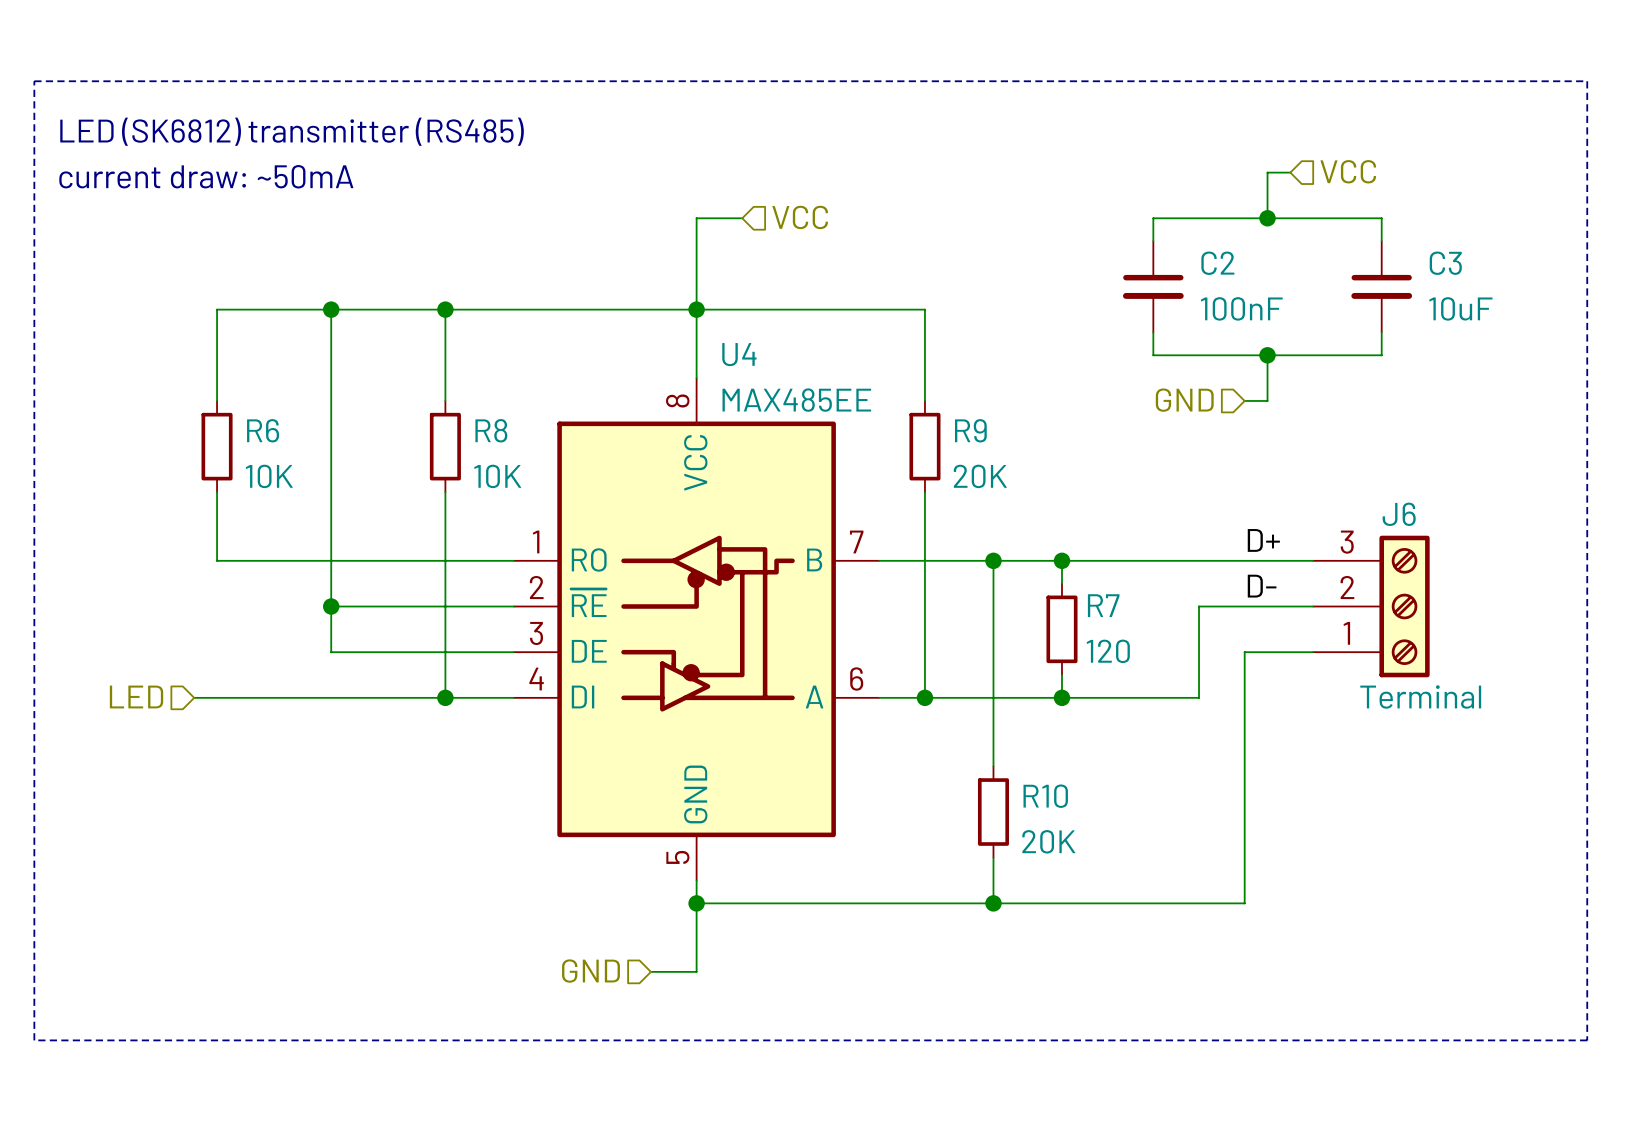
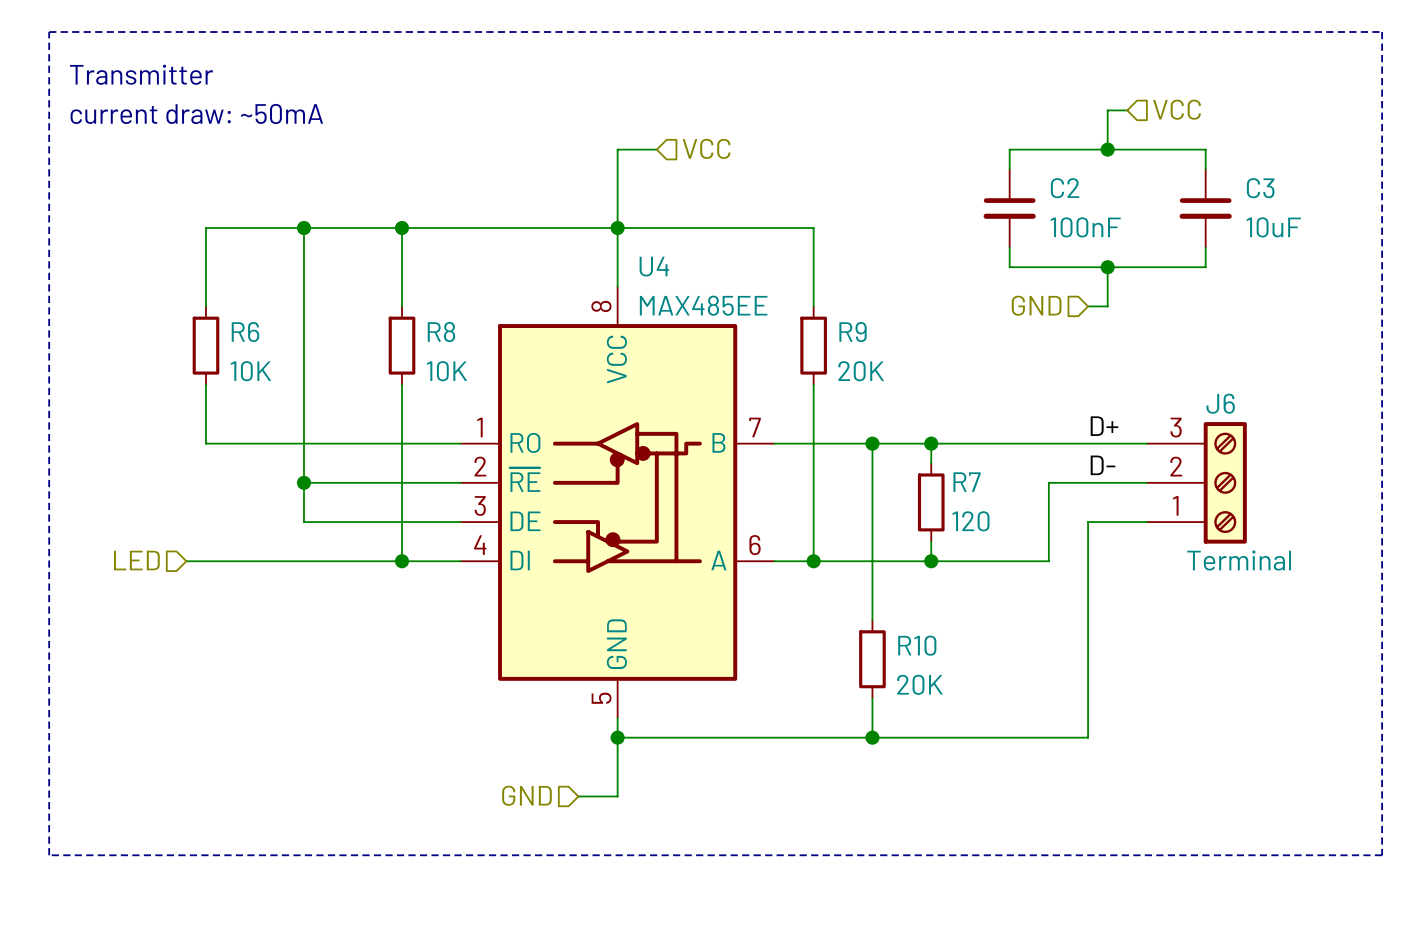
text: LED (SK6812) transmitter (RS485) (292, 131) -> Transmitter (141, 74)

